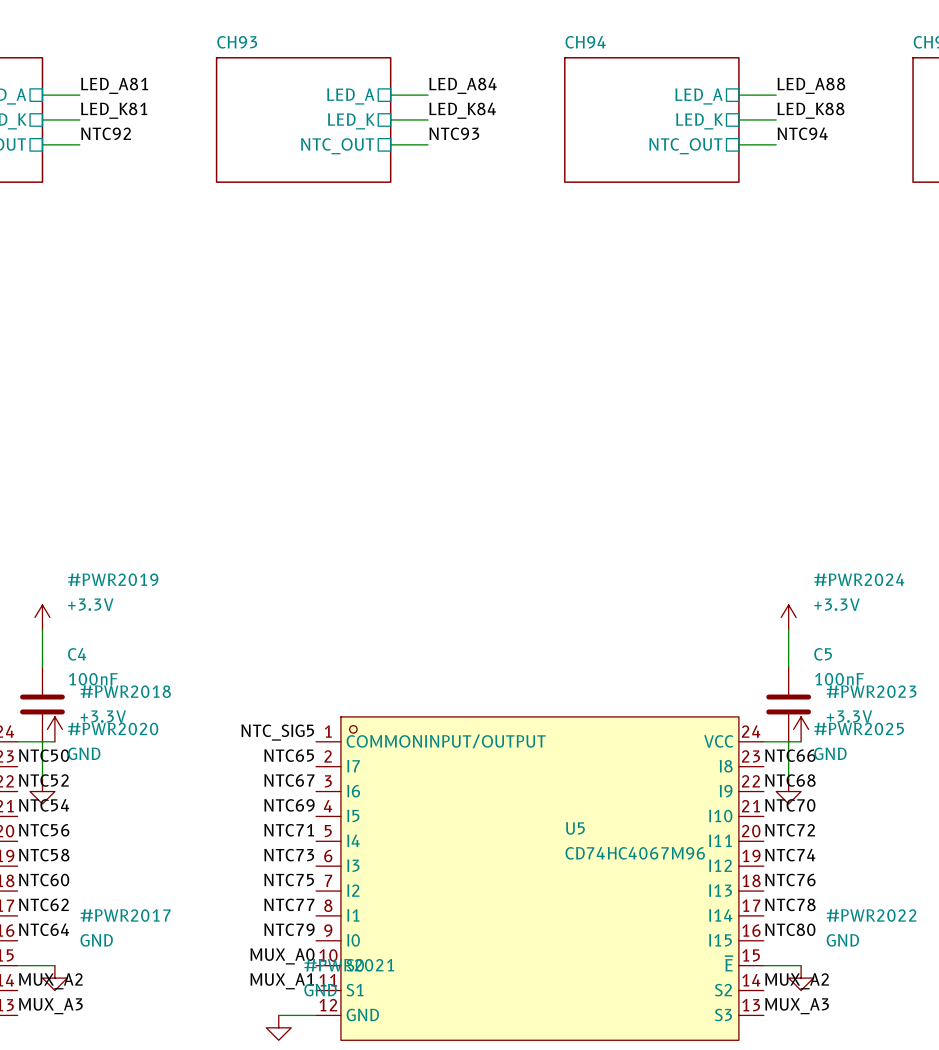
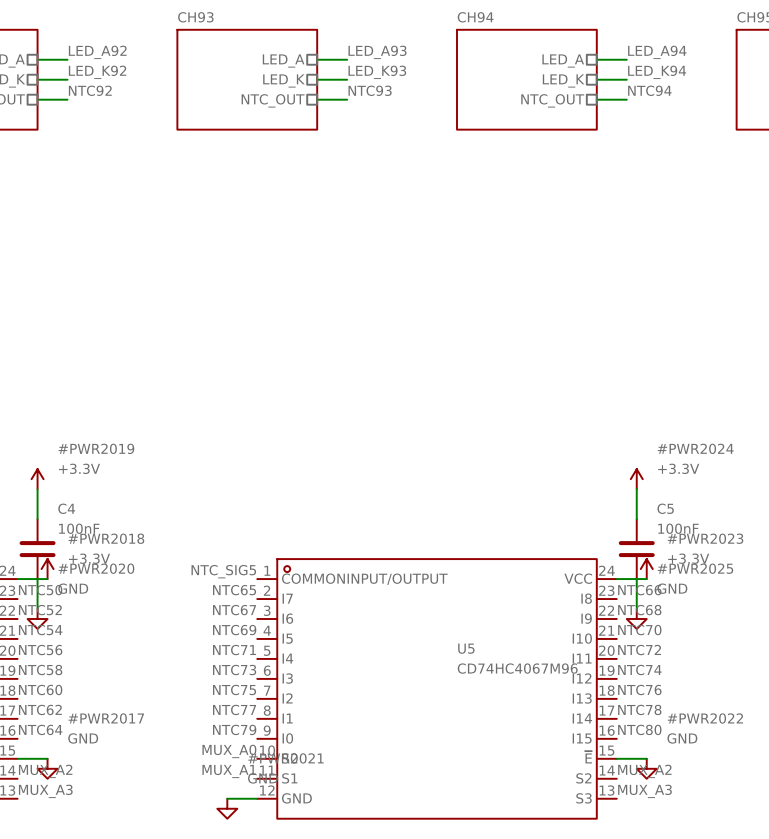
label: LED_A81 (114, 85) -> LED_A92 (97, 52)
label: LED_A84 (463, 85) -> LED_A93 (377, 52)
label: LED_A88 (811, 85) -> LED_A94 (657, 52)
label: LED_K81 (114, 110) -> LED_K92 (97, 72)
label: LED_K84 (462, 110) -> LED_K93 (377, 72)
label: LED_K88 (810, 110) -> LED_K94 (657, 72)

